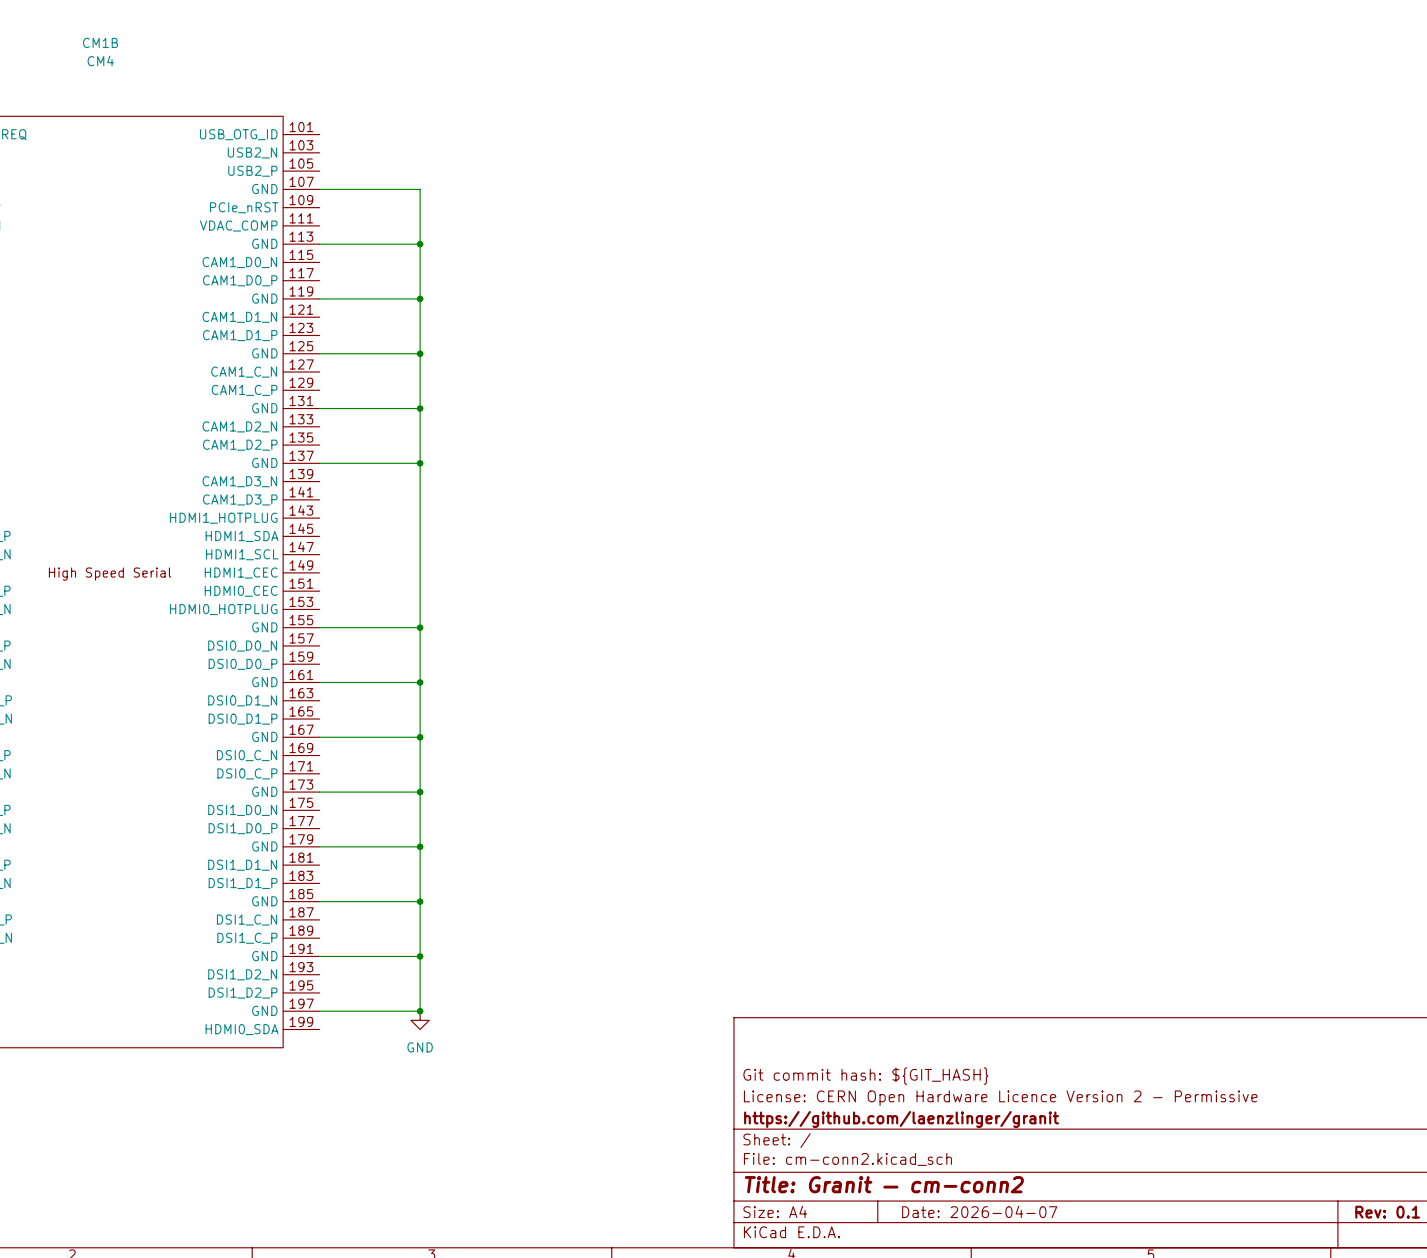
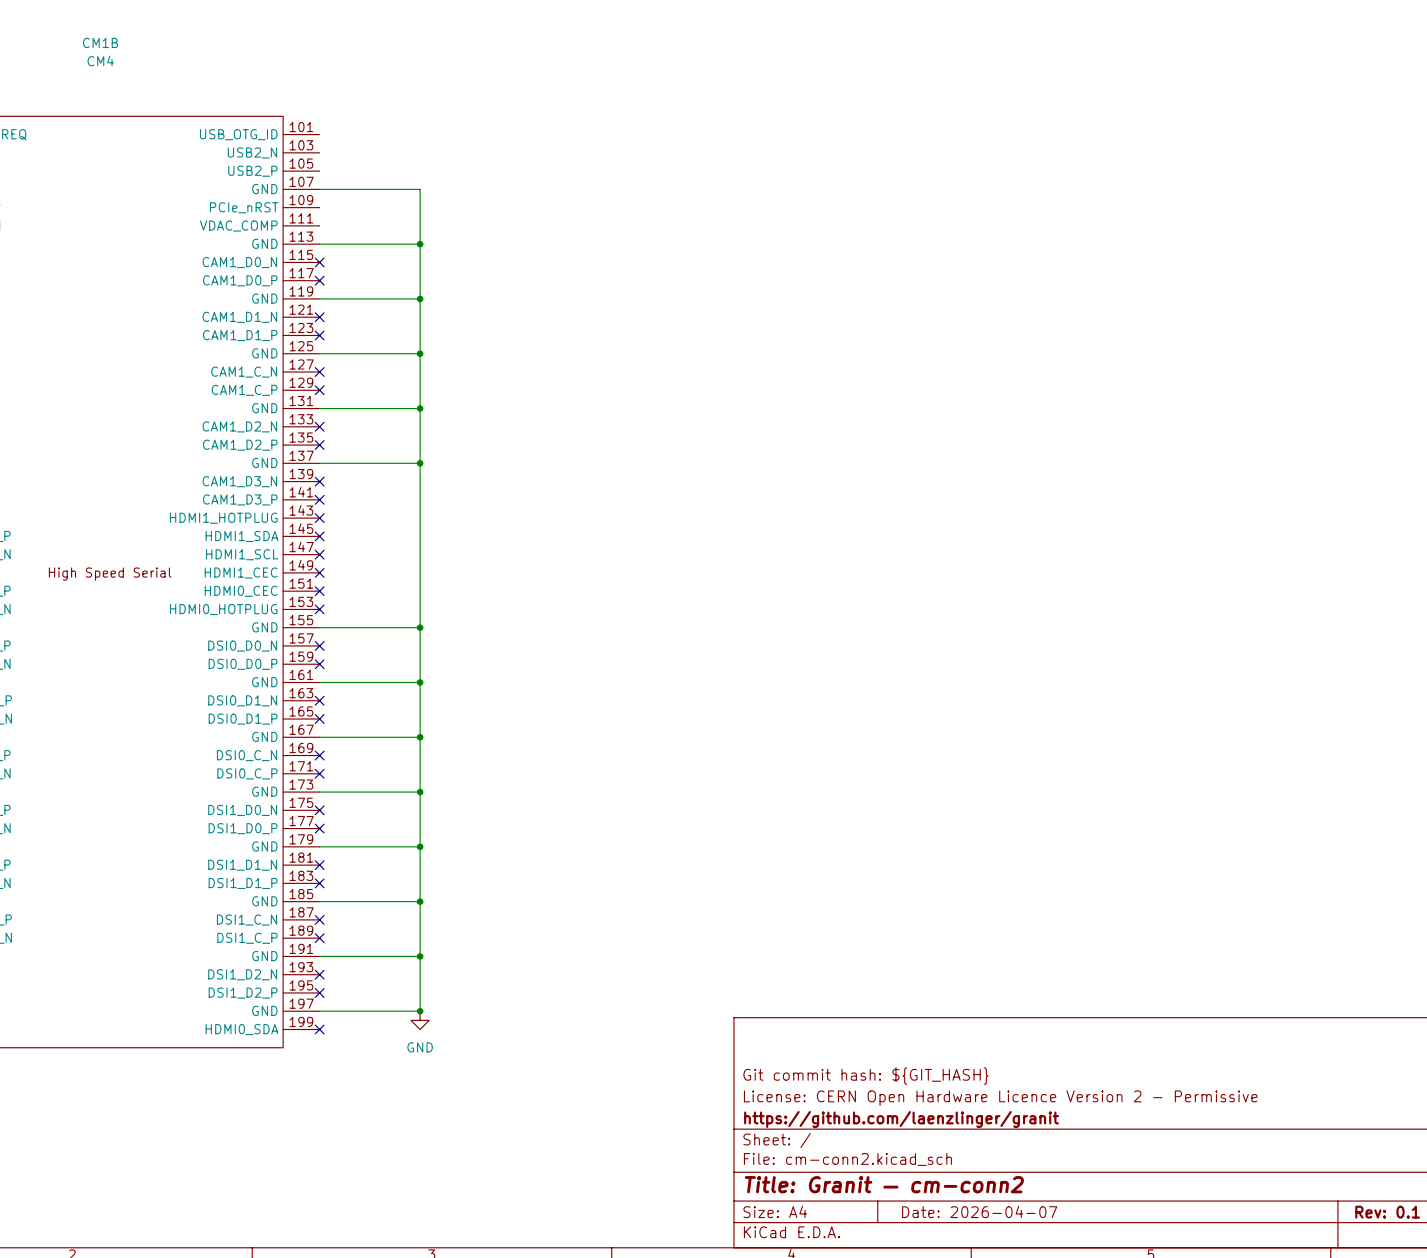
no-connect mark: none -> (319, 262)
no-connect mark: none -> (319, 280)
no-connect mark: none -> (319, 317)
no-connect mark: none -> (319, 335)
no-connect mark: none -> (319, 372)
no-connect mark: none -> (319, 390)
no-connect mark: none -> (319, 426)
no-connect mark: none -> (319, 445)
no-connect mark: none -> (319, 481)
no-connect mark: none -> (319, 499)
no-connect mark: none -> (319, 518)
no-connect mark: none -> (319, 536)
no-connect mark: none -> (319, 554)
no-connect mark: none -> (319, 572)
no-connect mark: none -> (319, 591)
no-connect mark: none -> (319, 609)
no-connect mark: none -> (319, 645)
no-connect mark: none -> (319, 664)
no-connect mark: none -> (319, 700)
no-connect mark: none -> (319, 719)
no-connect mark: none -> (319, 755)
no-connect mark: none -> (319, 773)
no-connect mark: none -> (319, 810)
no-connect mark: none -> (319, 828)
no-connect mark: none -> (319, 865)
no-connect mark: none -> (319, 883)
no-connect mark: none -> (319, 919)
no-connect mark: none -> (319, 938)
no-connect mark: none -> (319, 974)
no-connect mark: none -> (319, 992)
no-connect mark: none -> (319, 1029)

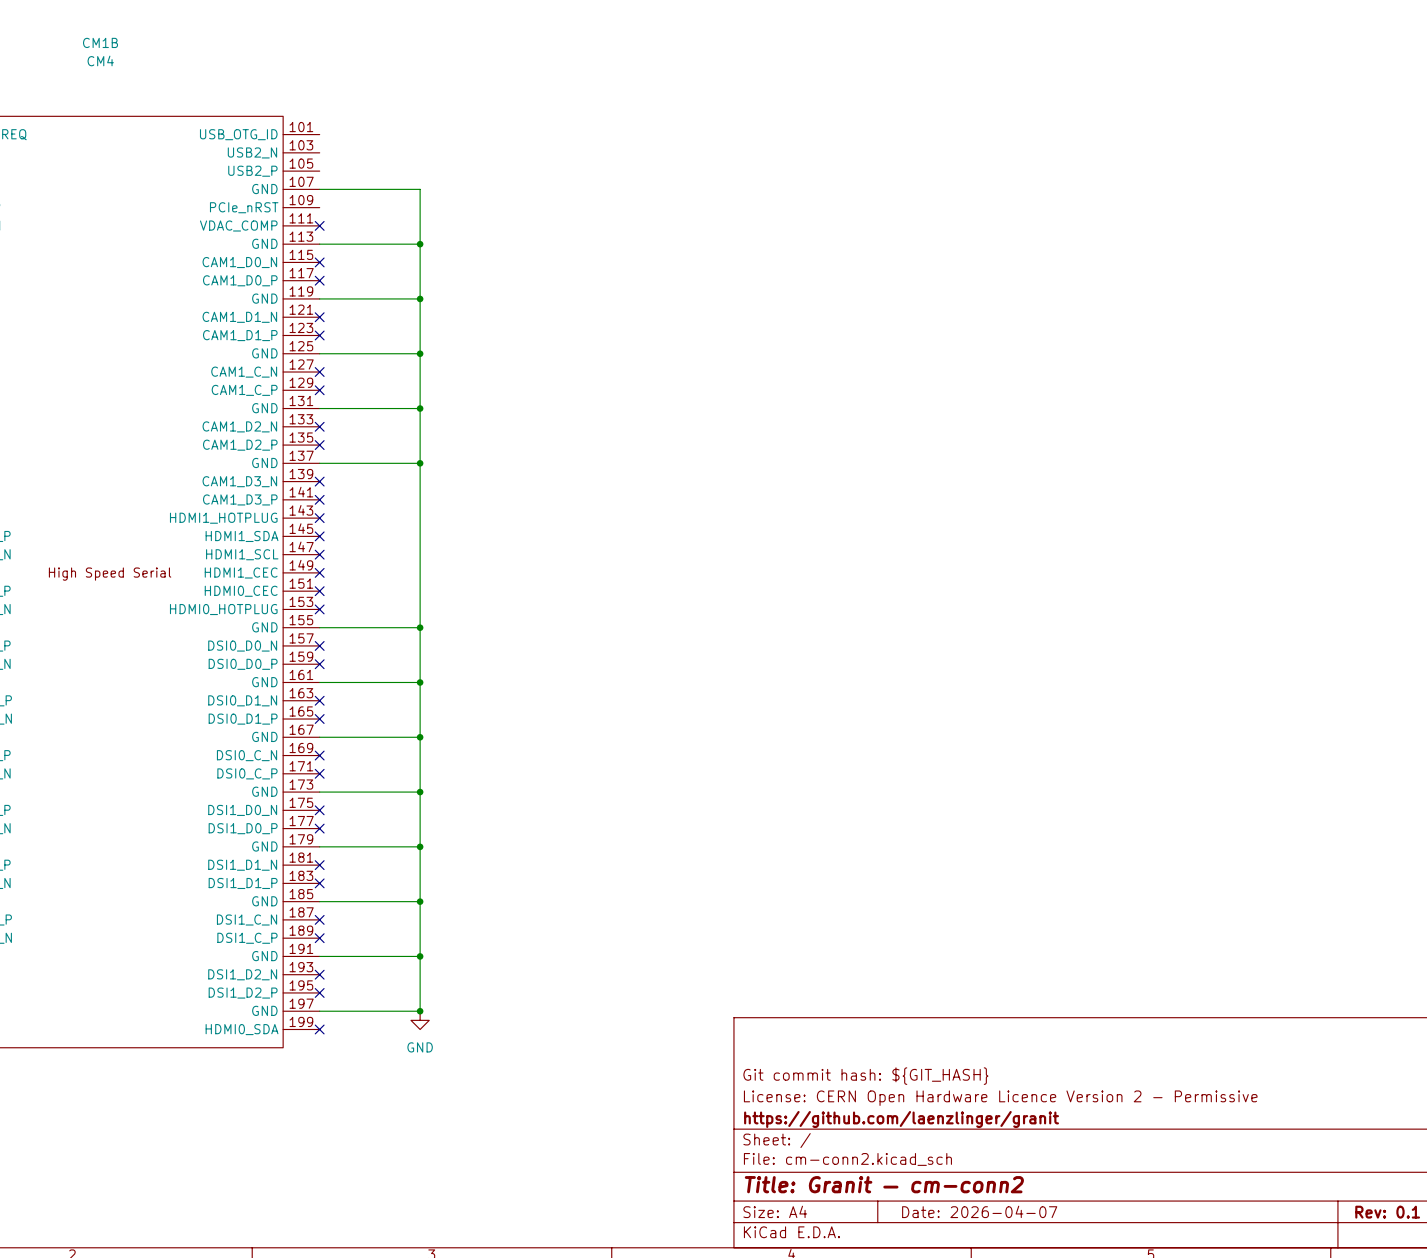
no-connect mark: none -> (319, 225)

